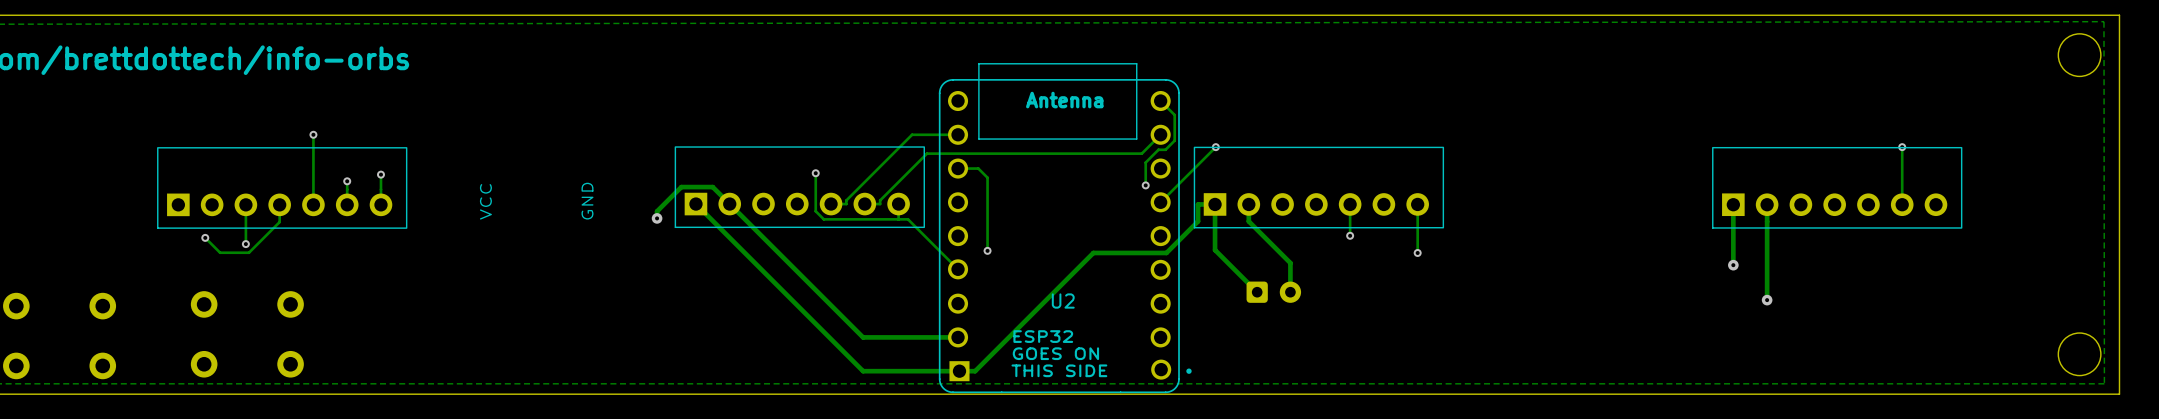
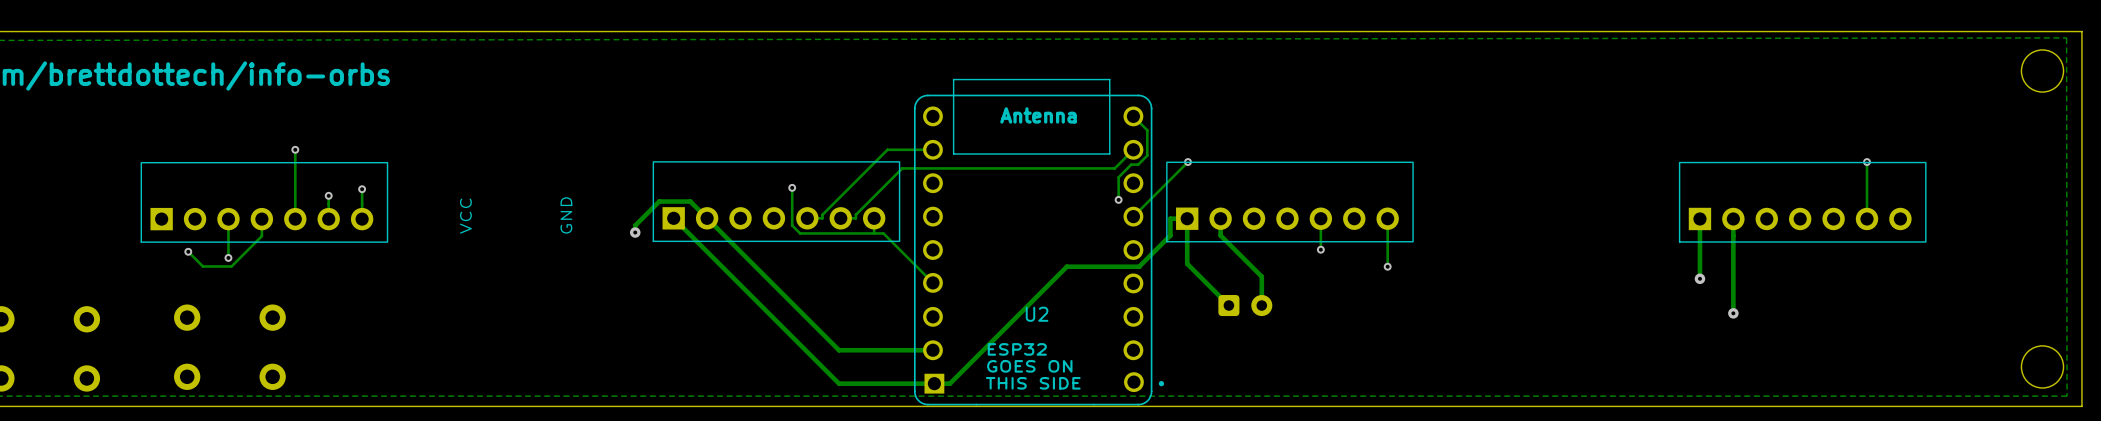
track: (958, 168) (978, 168) (987, 177) (987, 250) -> none
via: (987, 250) -> none

